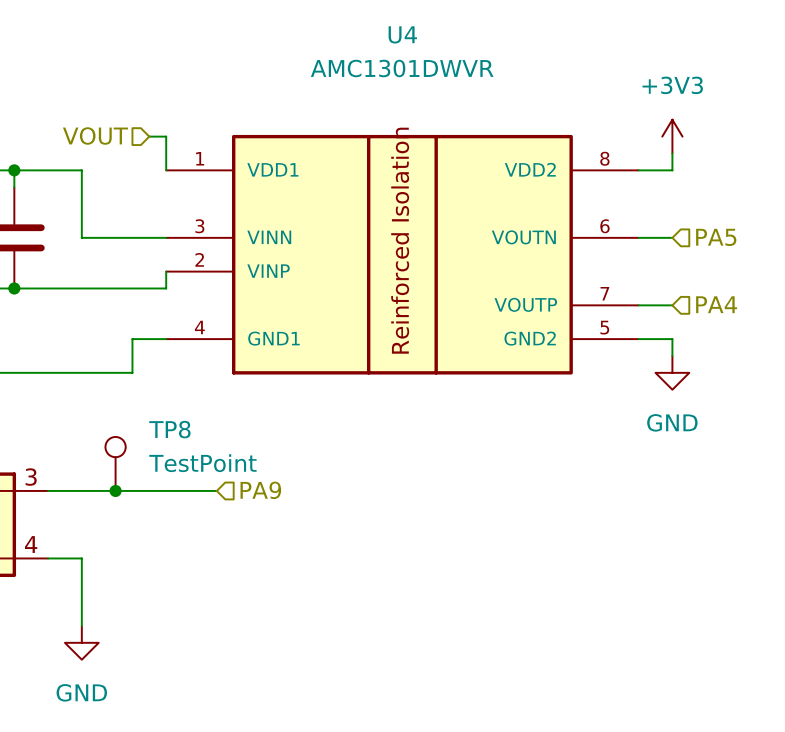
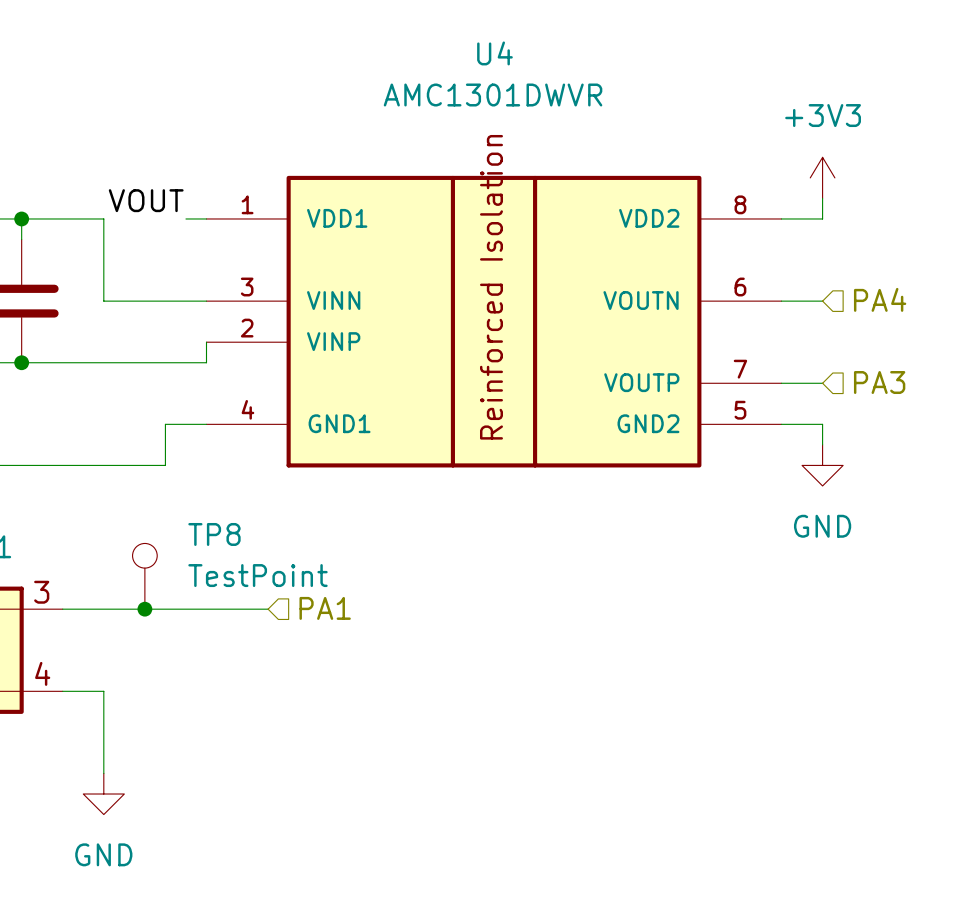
hierarchical label: VOUT (95, 136) -> none
wire: (149, 136) (166, 136) (166, 170) -> (185, 218) (206, 218)
label: none -> VOUT (146, 200)
hierarchical label: PA5 (716, 237) -> PA4 (880, 299)
hierarchical label: PA4 (716, 304) -> PA3 (879, 382)
hierarchical label: PA9 (260, 490) -> PA1 (325, 608)

